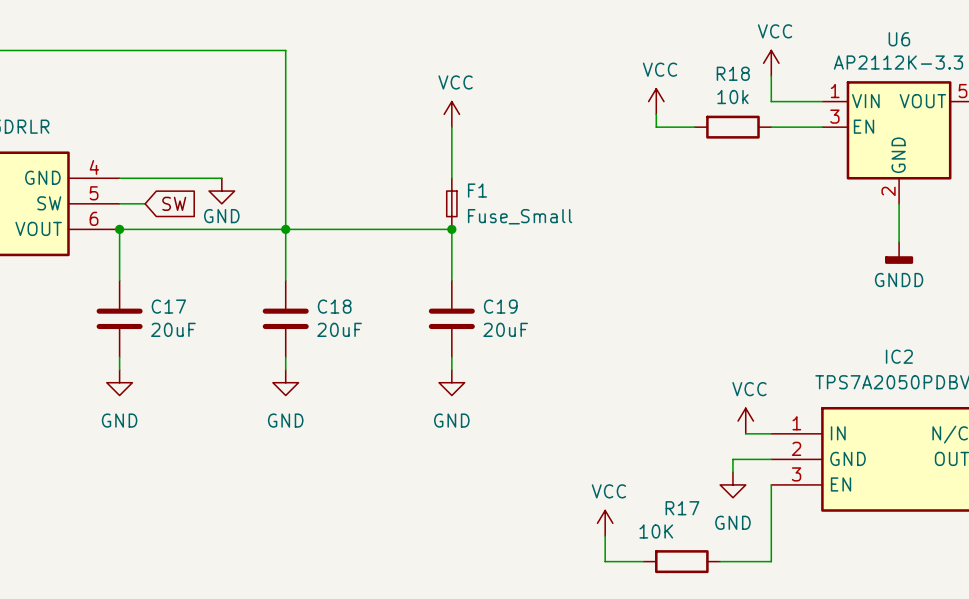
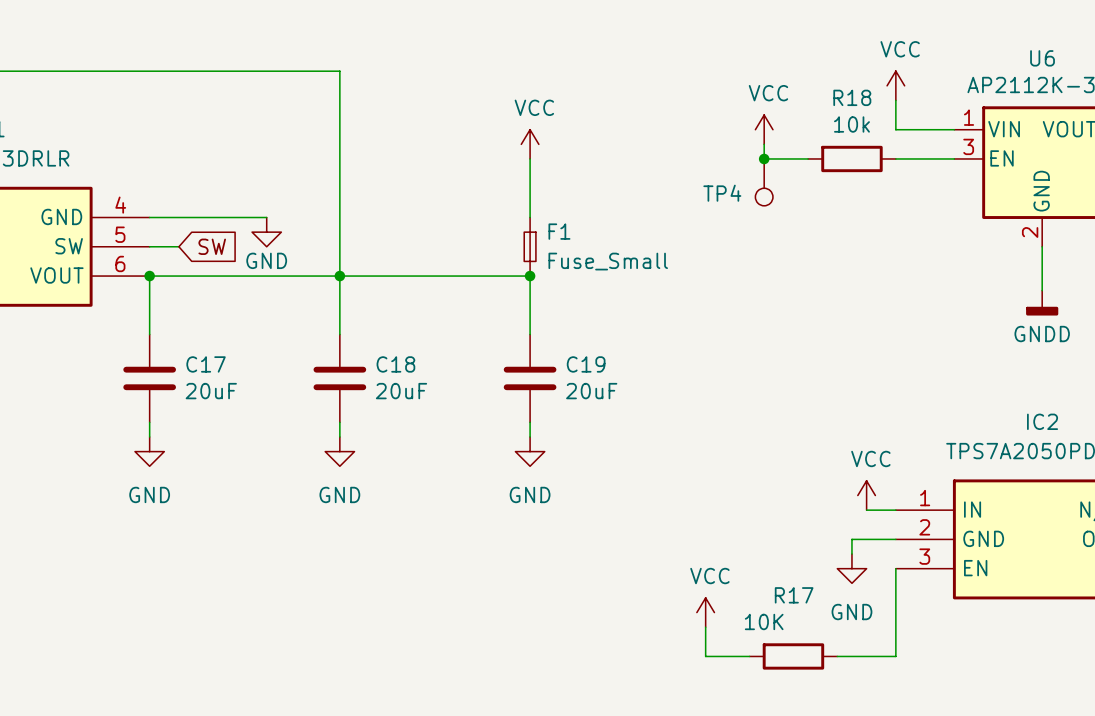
junction: none -> (764, 158)
TP4: none -> (764, 182)

